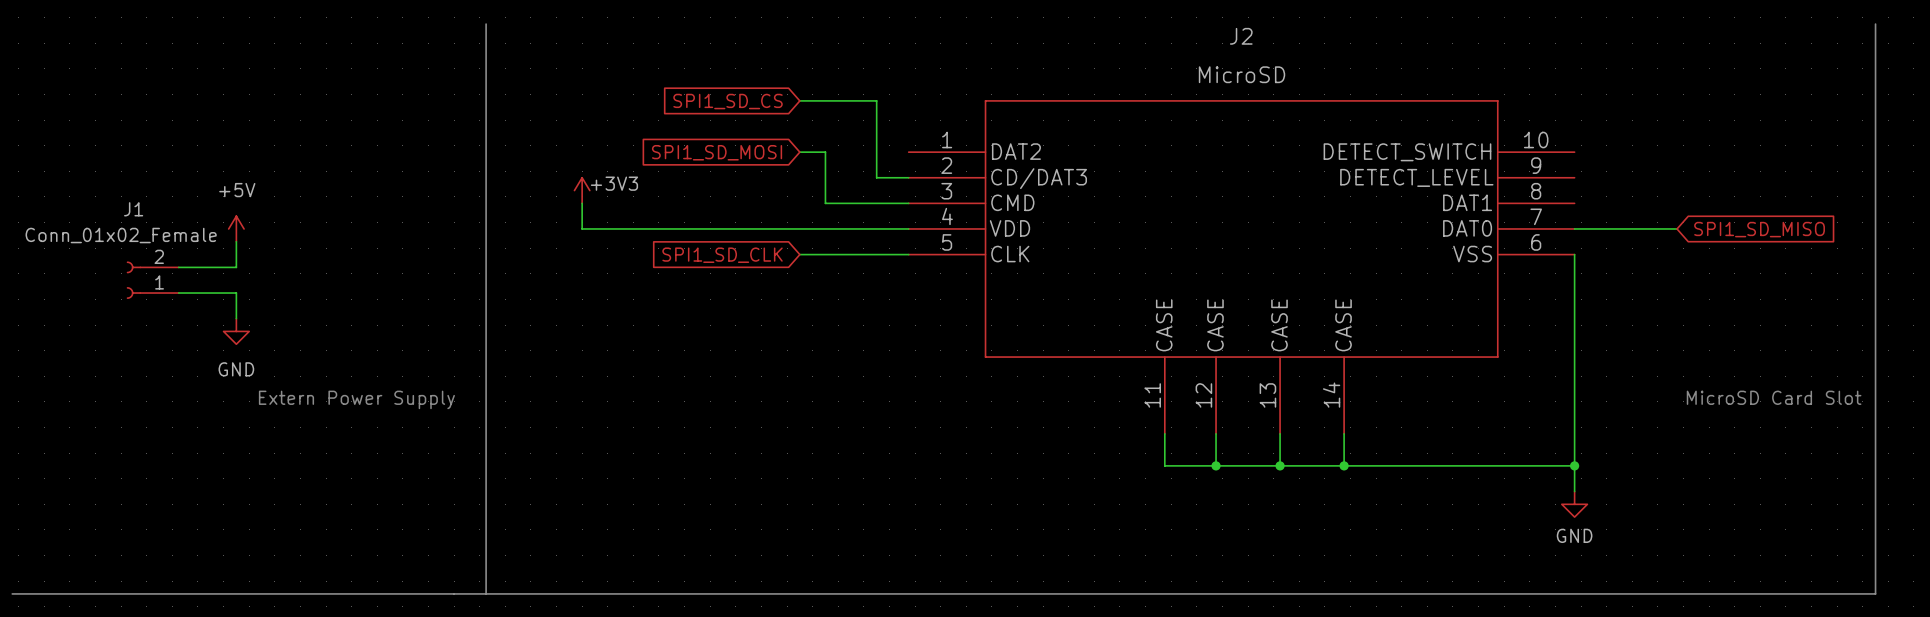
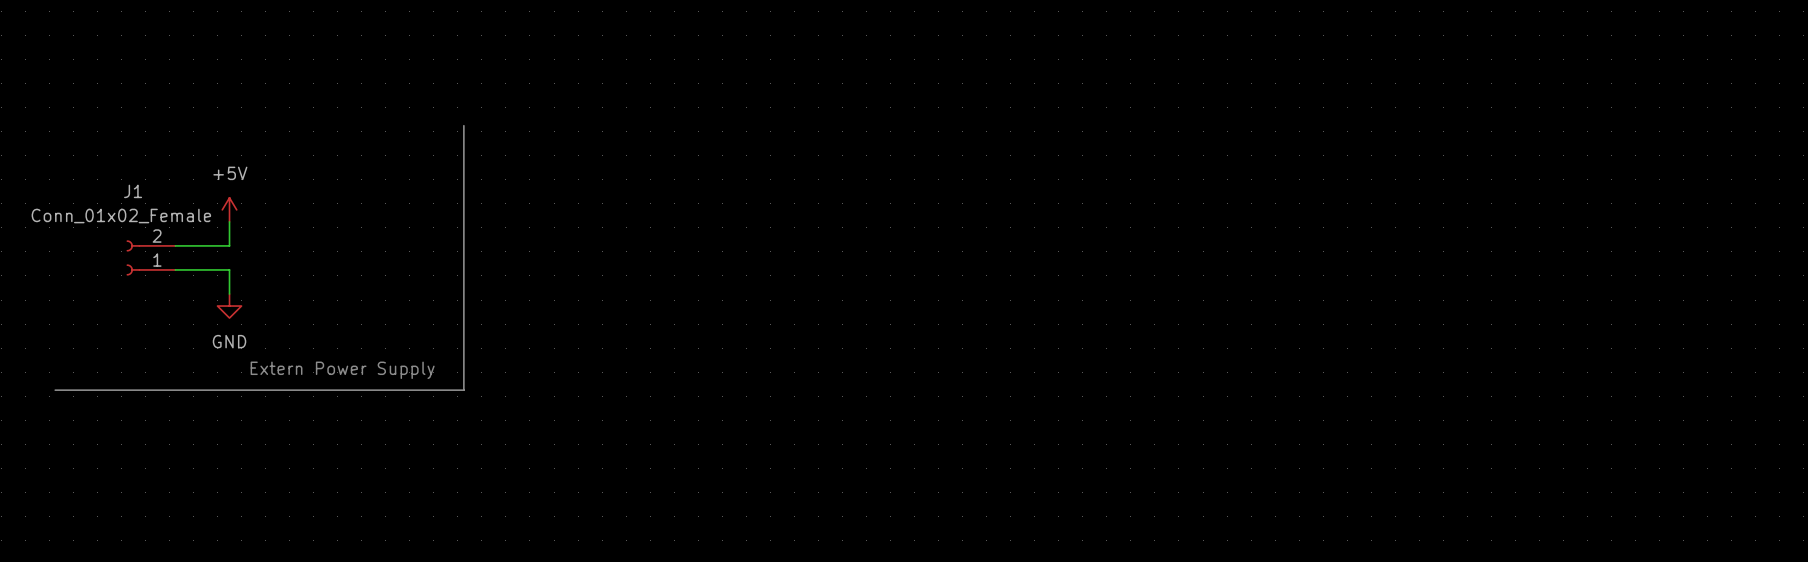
line: (486, 24) (486, 139) -> none
line: (1875, 24) (1875, 593) (12, 593) -> none
wire: (799, 100) (876, 100) (876, 177) (908, 177) -> none
global label: SPI1_SD_CS (728, 101) -> none
global label: SPI1_SD_MOSI (717, 152) -> none
wire: (799, 152) (825, 152) (825, 203) (908, 203) -> none
power symbol: +3V3 (582, 190) -> none
wire: (582, 203) (582, 228) (908, 228) -> none
wire: (1574, 228) (1677, 228) -> none
global label: SPI1_SD_MISO (1759, 229) -> none
wire: (799, 254) (908, 254) -> none
wire: (1574, 254) (1574, 491) -> none
global label: SPI1_SD_CLK (722, 255) -> none
J2: MicroSD (1241, 267) -> none
text: MicroSD Card Slot (1774, 397) -> none
line: (486, 421) (486, 593) -> (463, 390) (55, 390)
wire: (1164, 433) (1164, 465) (1574, 465) -> none
wire: (1216, 433) (1216, 465) -> none
wire: (1280, 433) (1280, 465) -> none
wire: (1344, 433) (1344, 465) -> none
junction: (1216, 465) -> none
junction: (1280, 465) -> none
junction: (1344, 465) -> none
junction: (1574, 465) -> none
power symbol: GND (1574, 504) -> none

